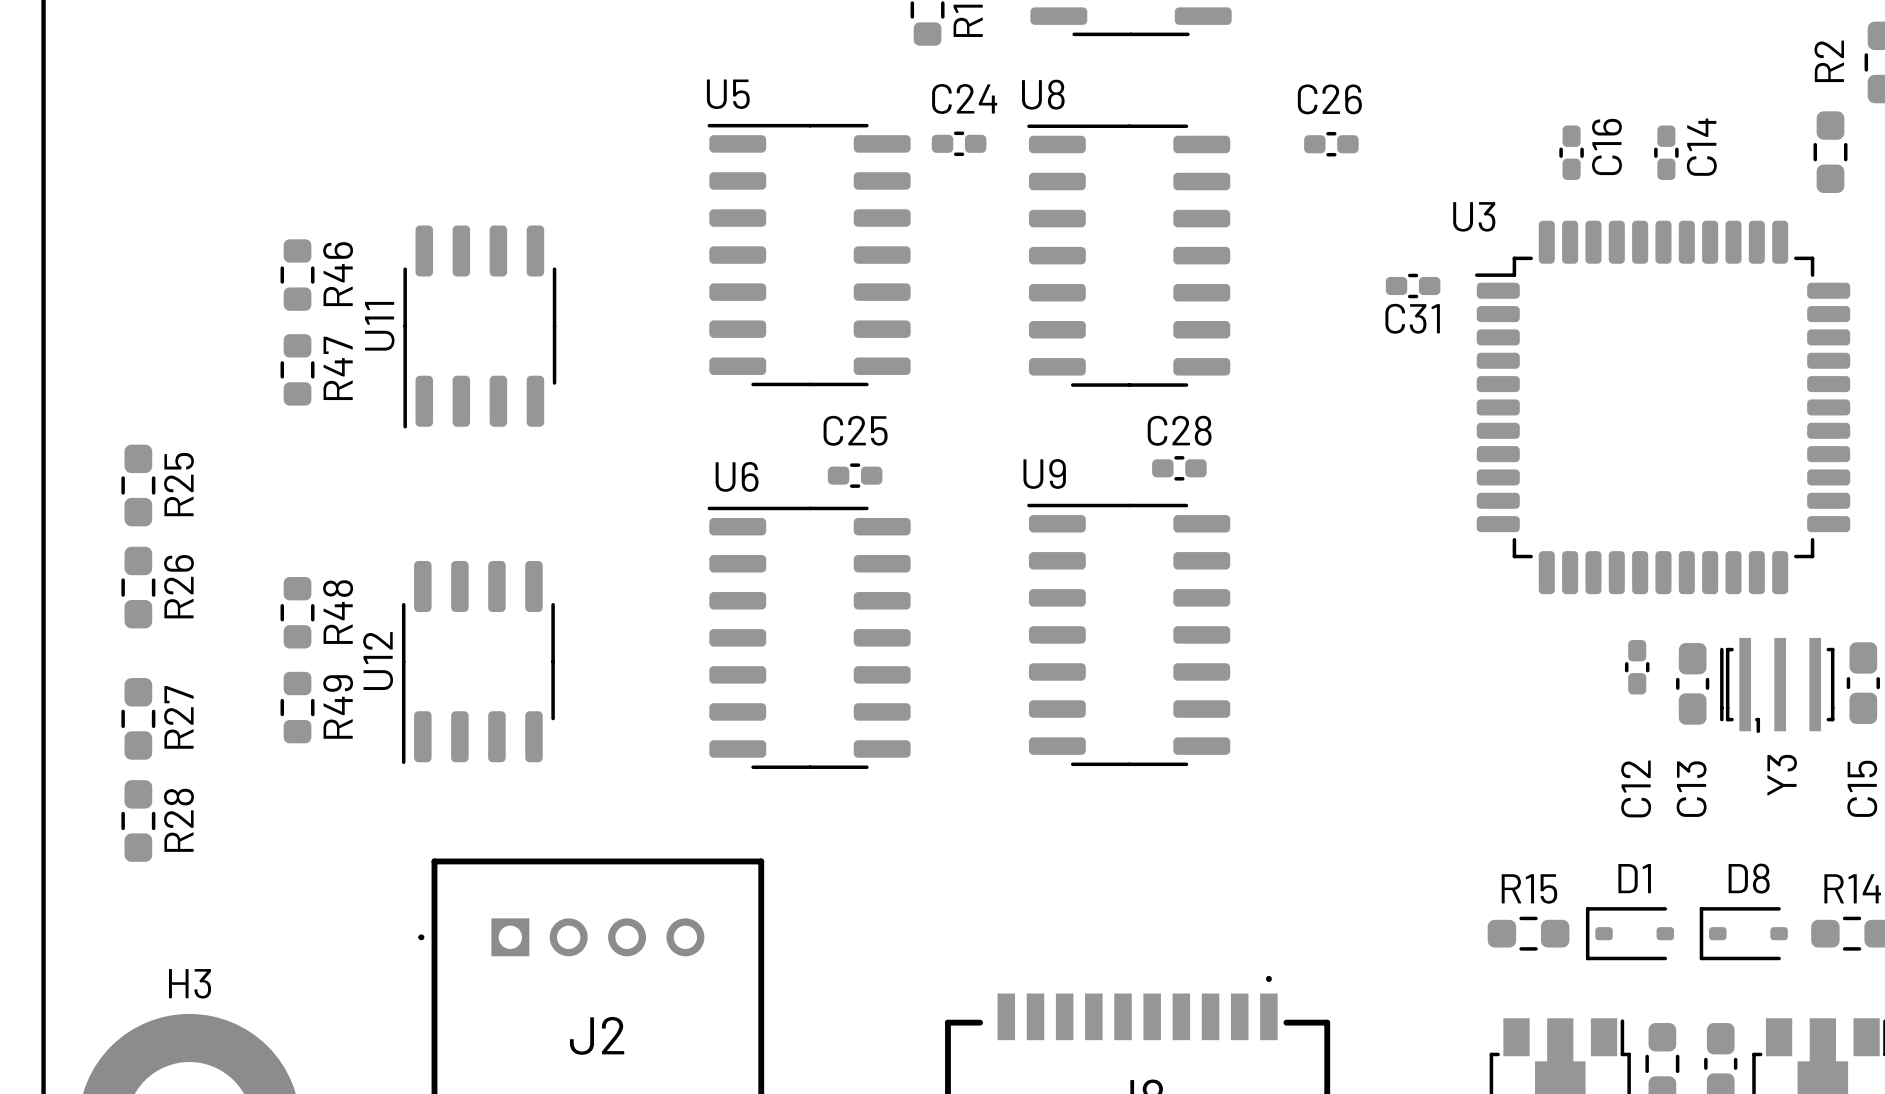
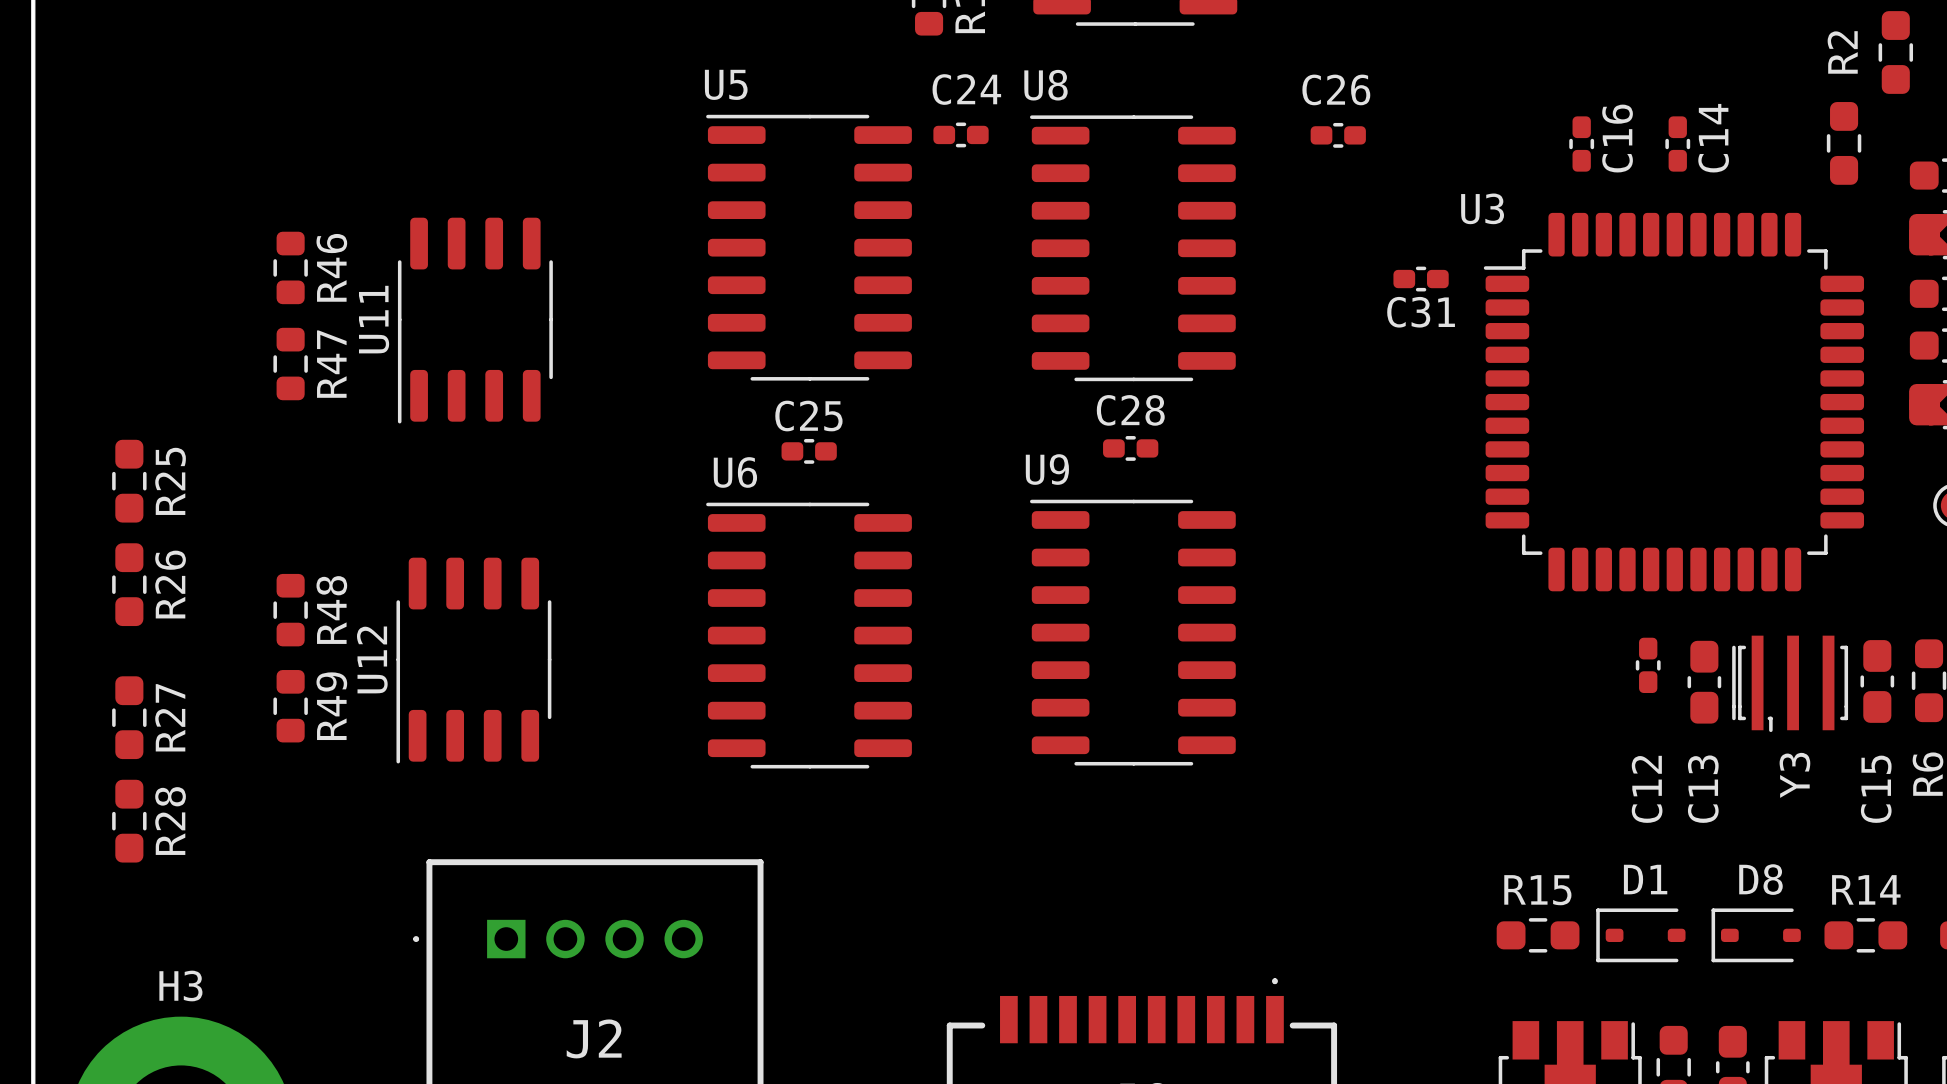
C25 name position: C25 (855, 430) -> C25 (808, 416)
C28 position: (1179, 468) -> (1130, 448)
C25 position: (855, 475) -> (809, 451)

